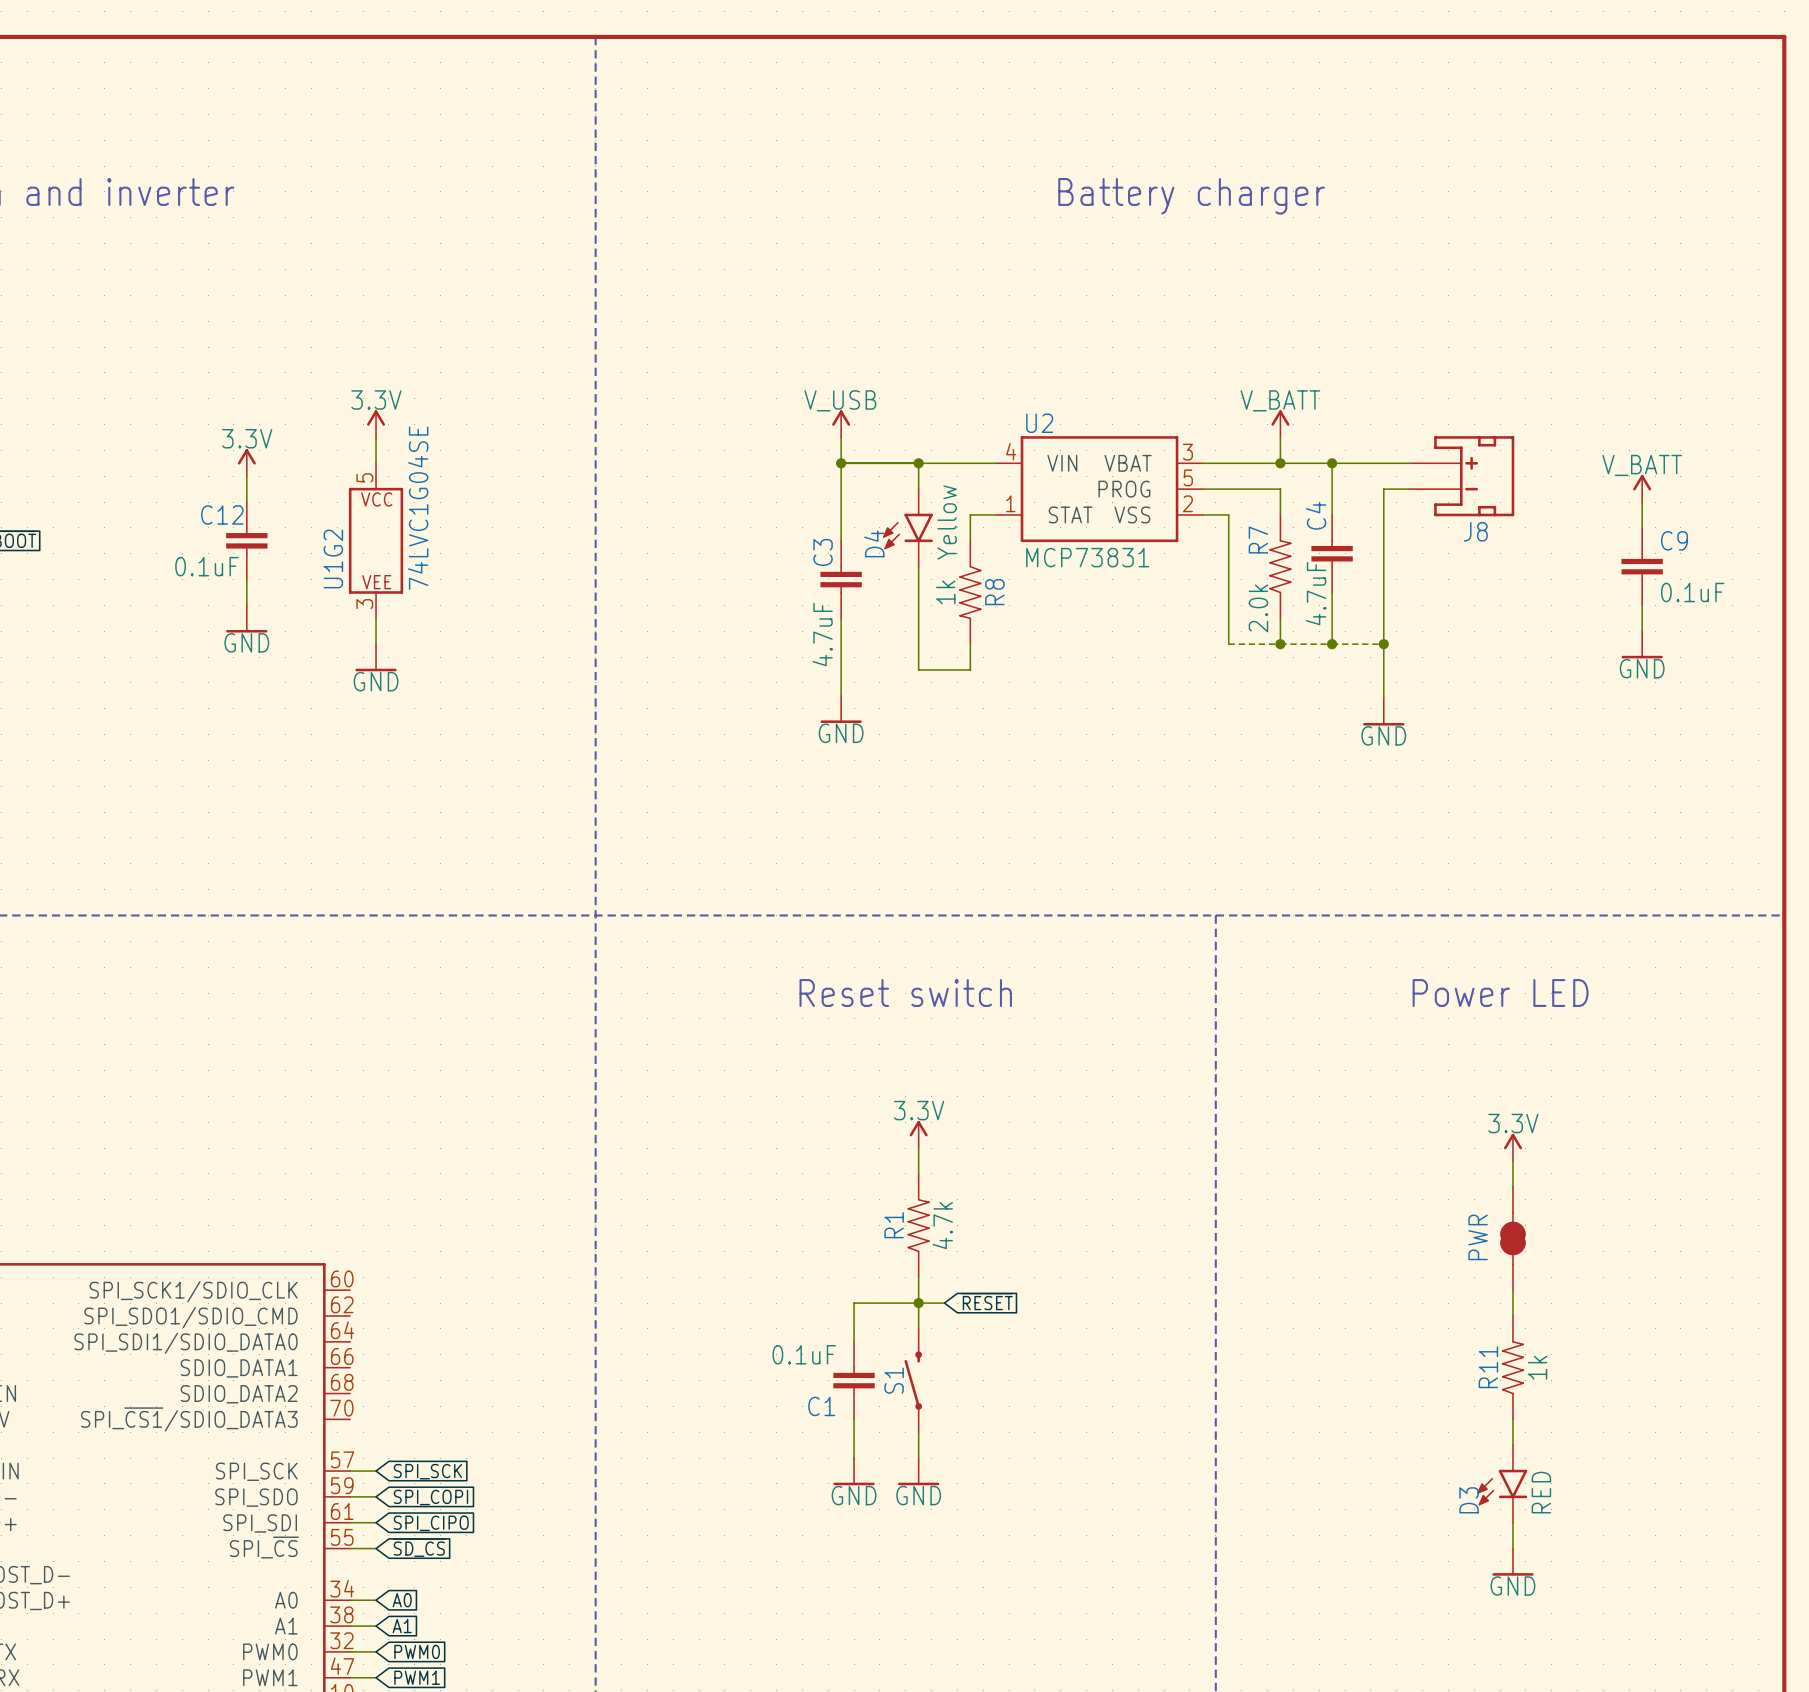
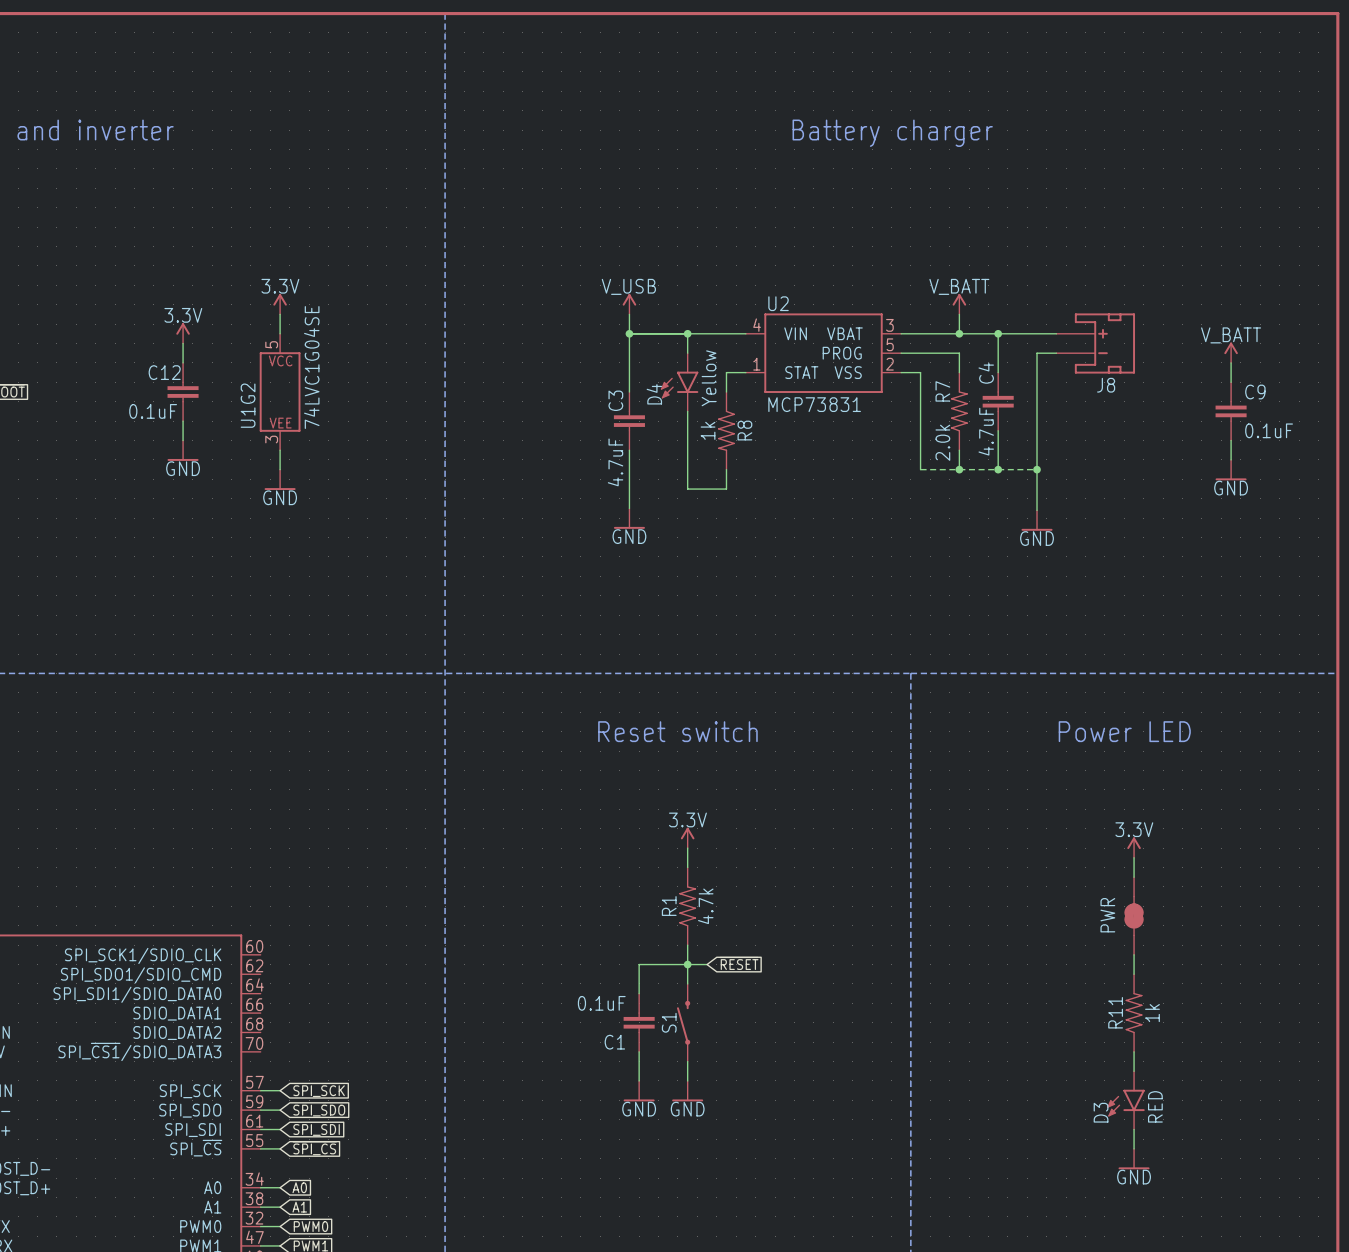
global label: SPI_COPI (430, 1497) -> SPI_SDO (319, 1110)
global label: SPI_CIPO (431, 1523) -> SPI_SDI (316, 1129)
global label: ~{SD_CS} (419, 1547) -> ~{SPI_CS} (314, 1148)

